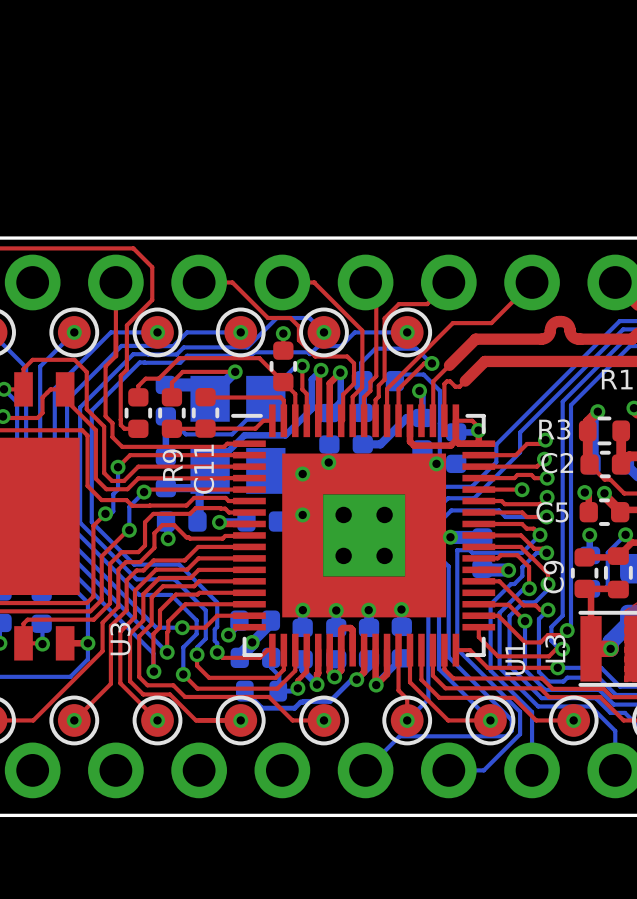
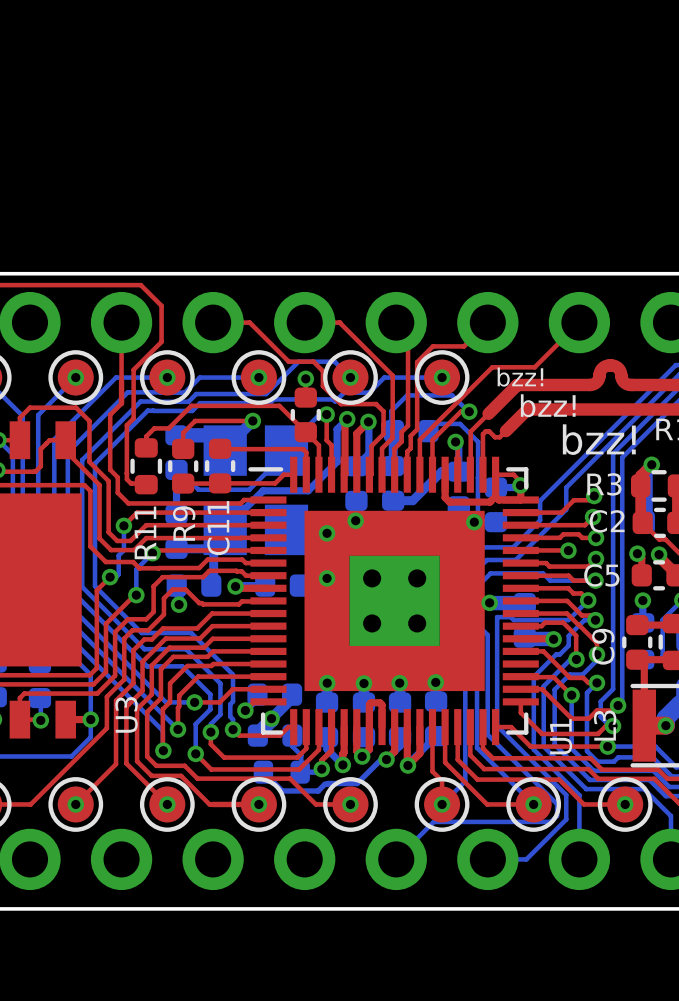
text: none -> bzz! (520, 377)
text: none -> bzz! (548, 405)
text: none -> bzz! (599, 439)
part: (138, 413) -> none
R11: none -> (146, 466)

